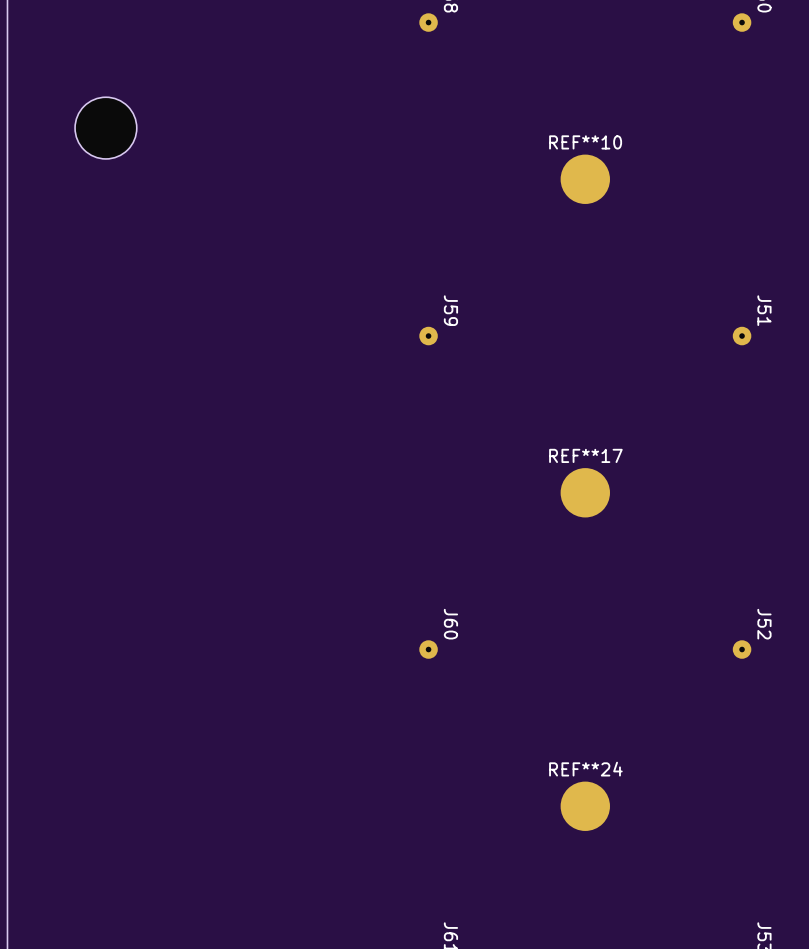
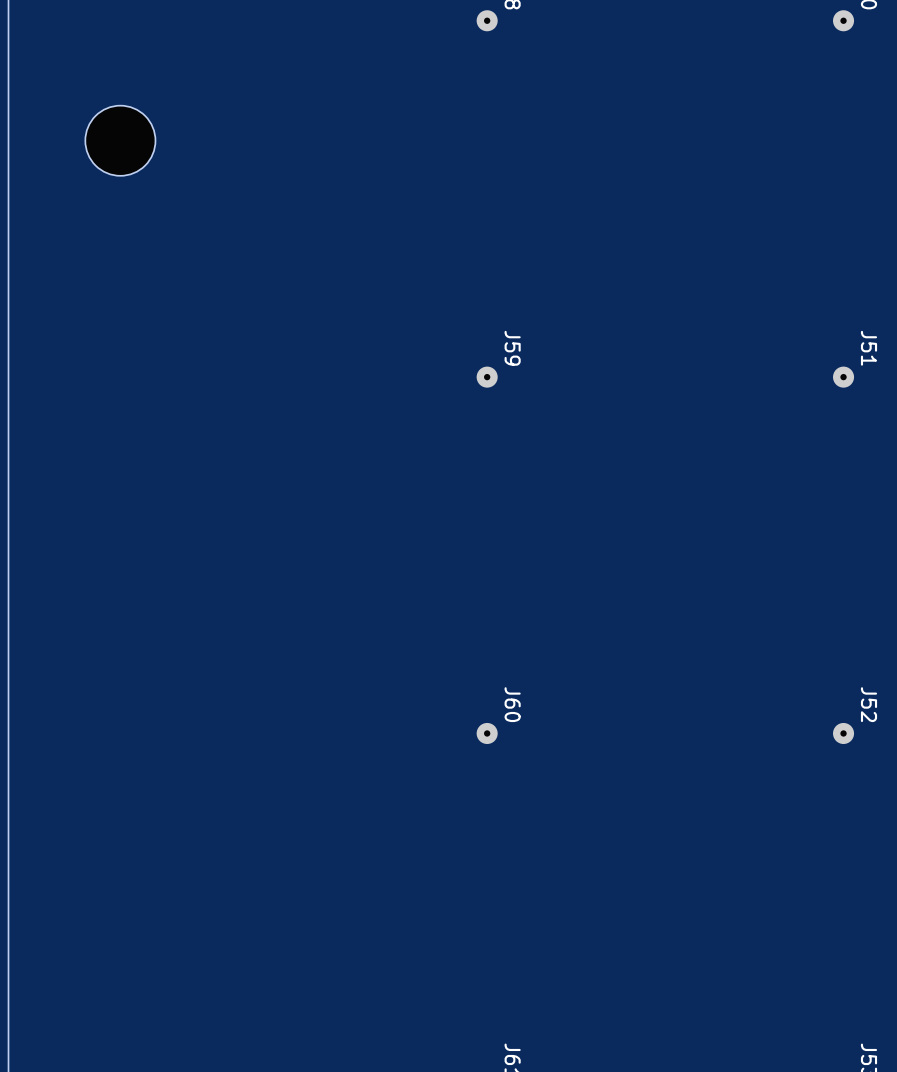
REF**10: (585, 179) -> none
REF**17: (585, 492) -> none
REF**24: (585, 806) -> none

